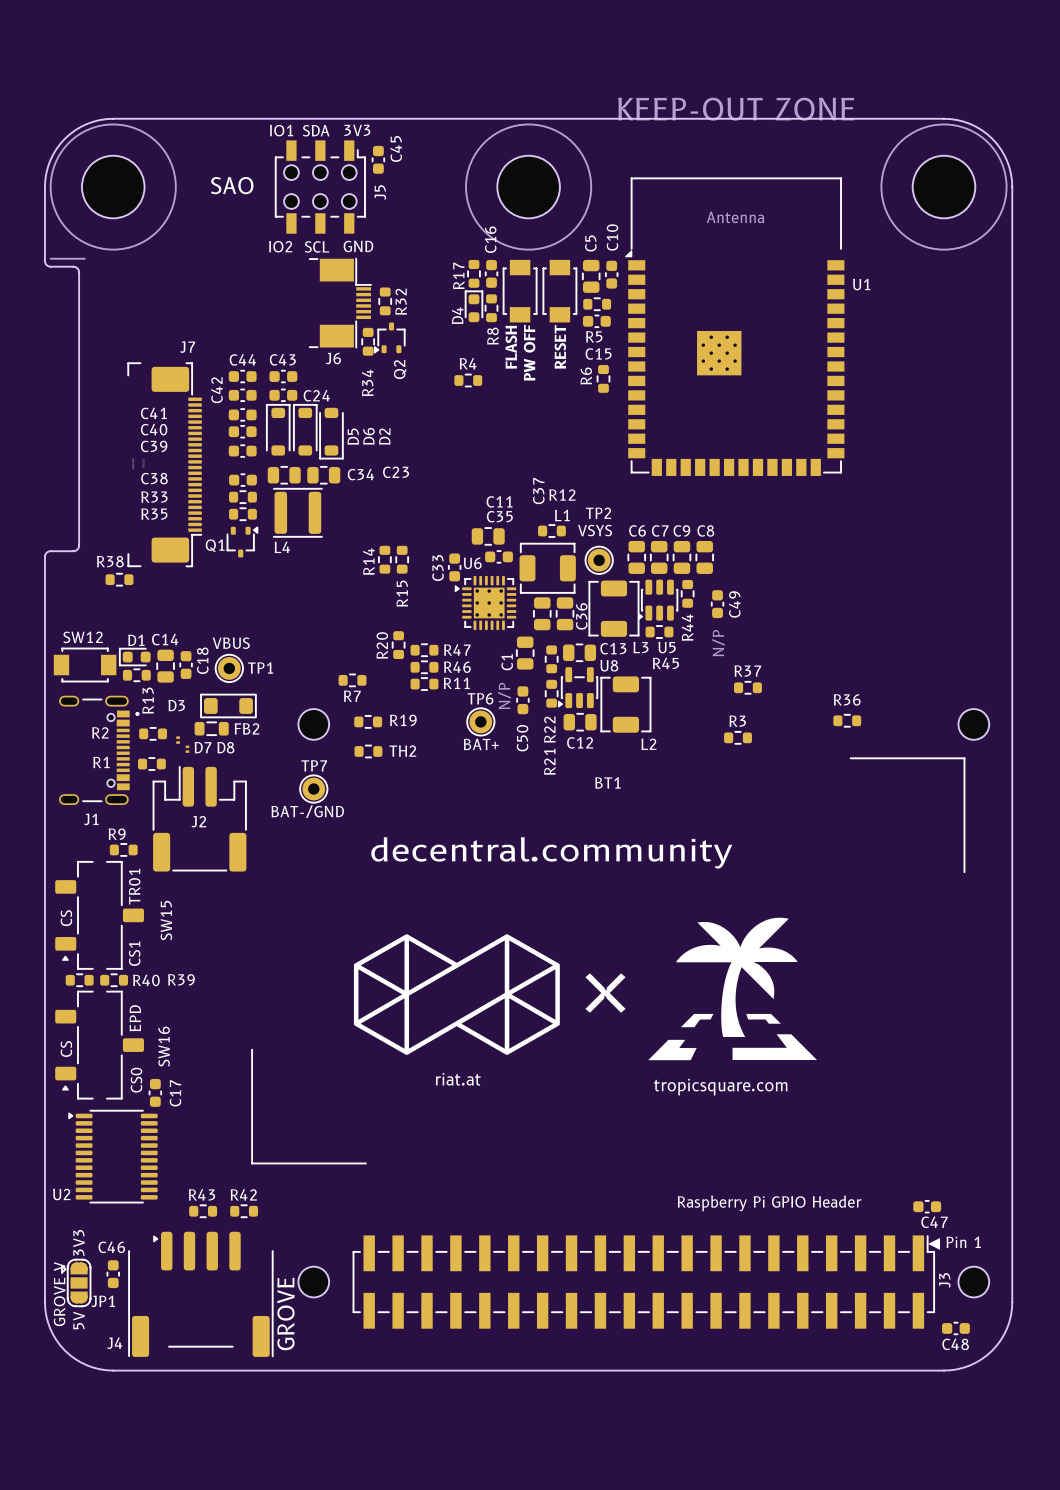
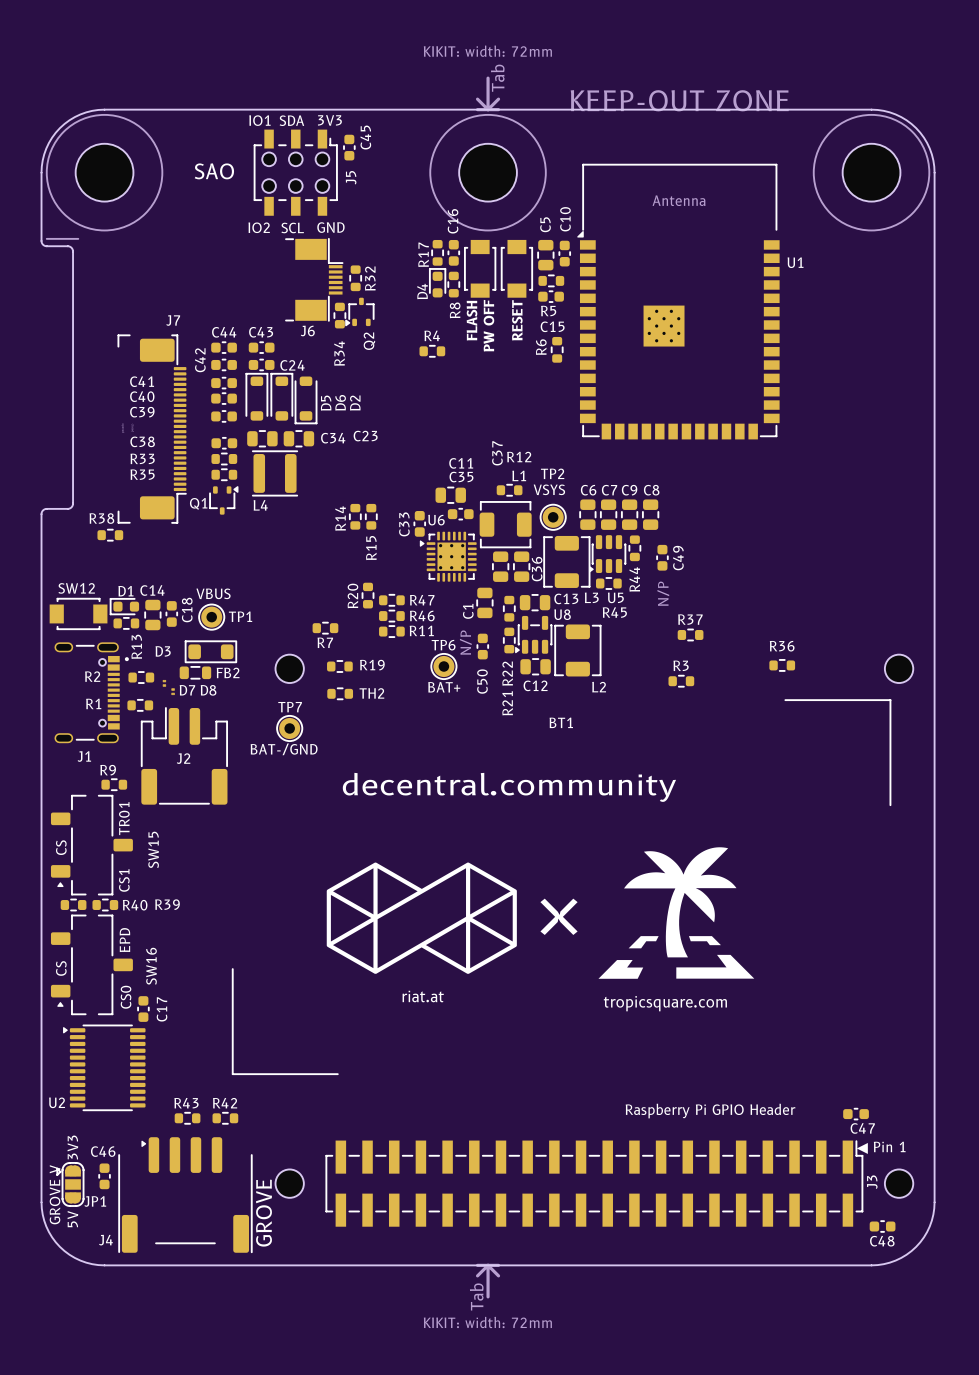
drawing: none -> [475, 76, 501, 112]
drawing: none -> [475, 1263, 501, 1299]

